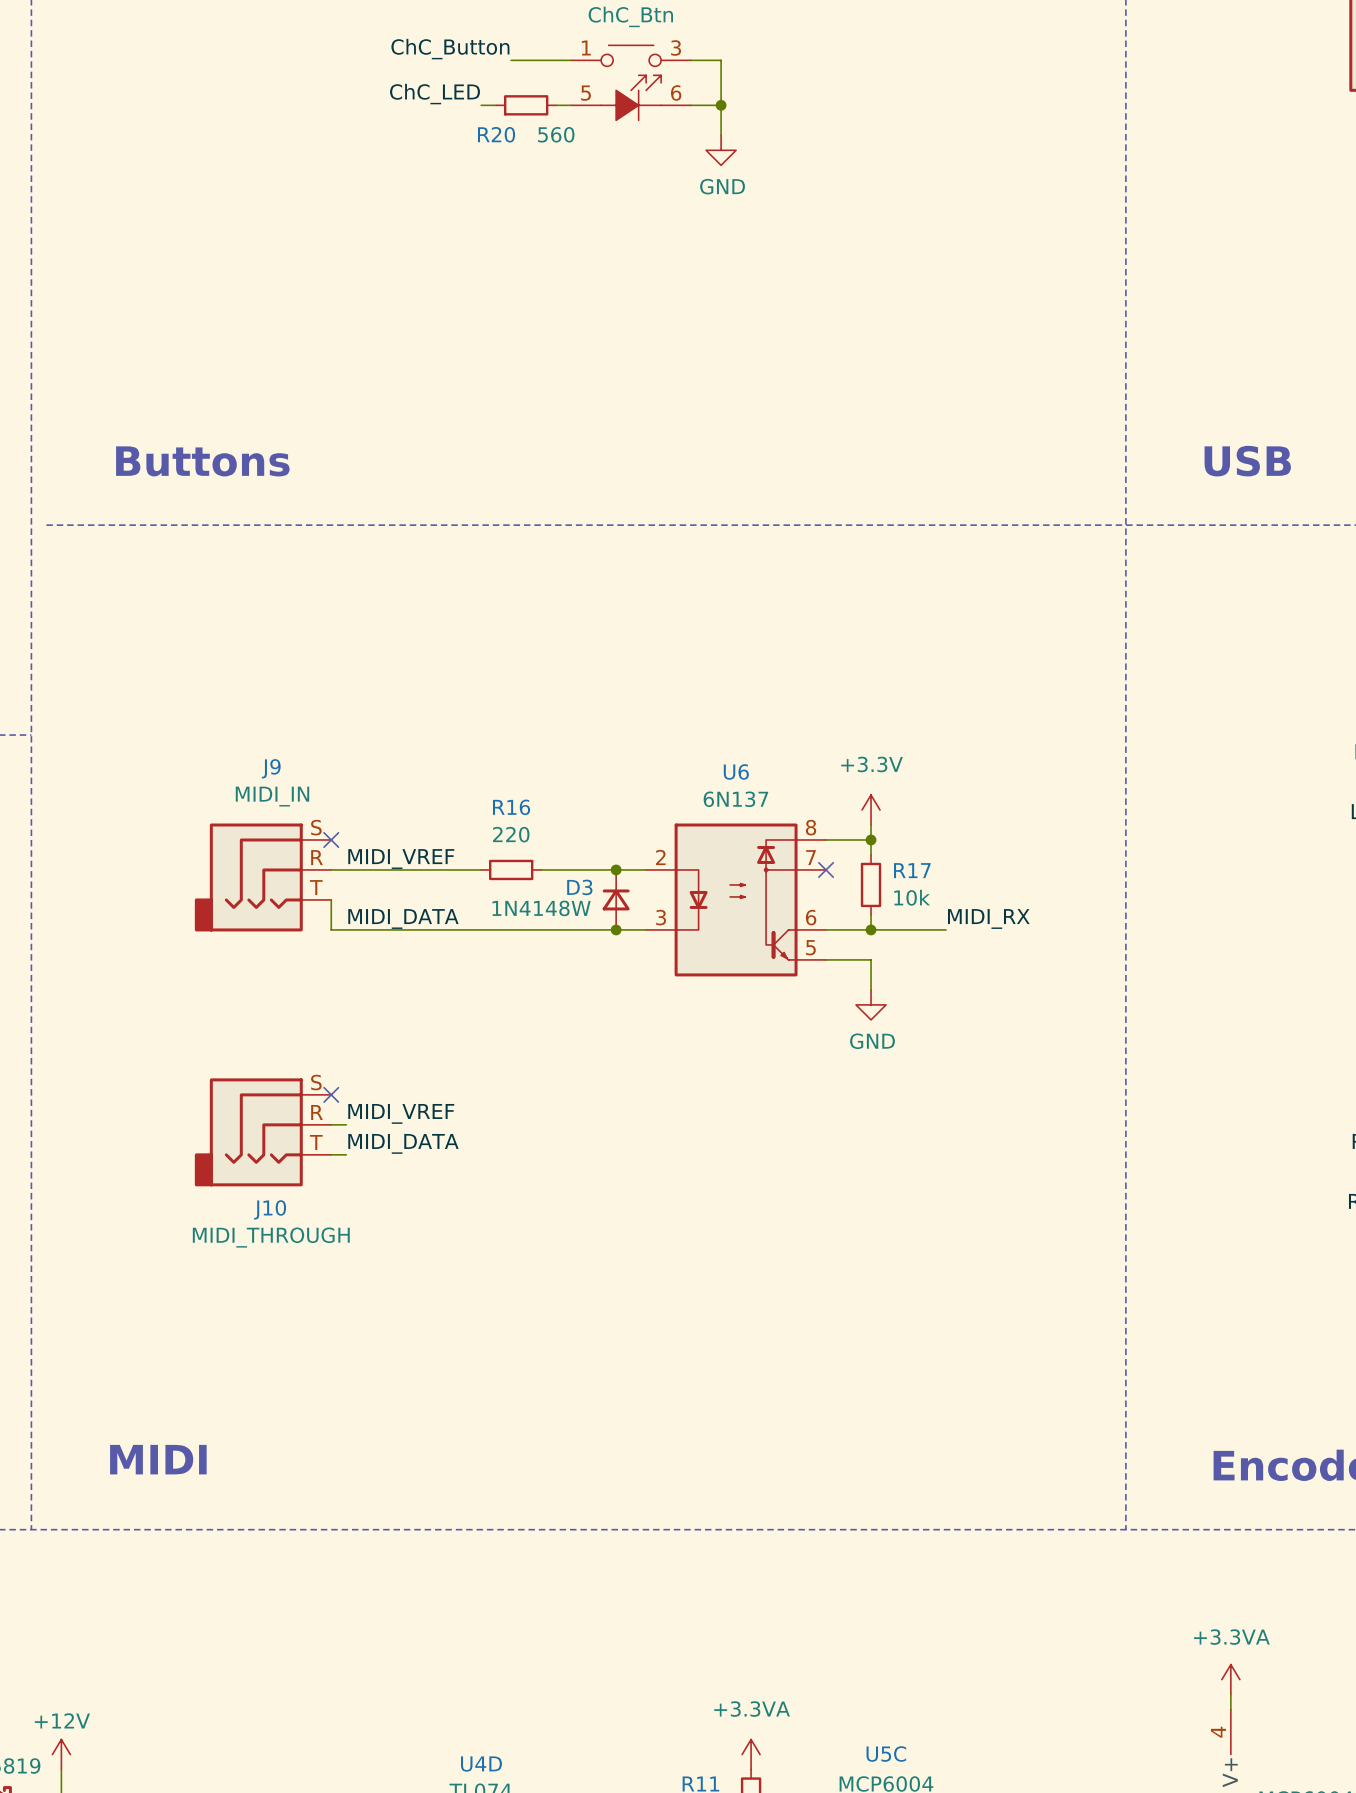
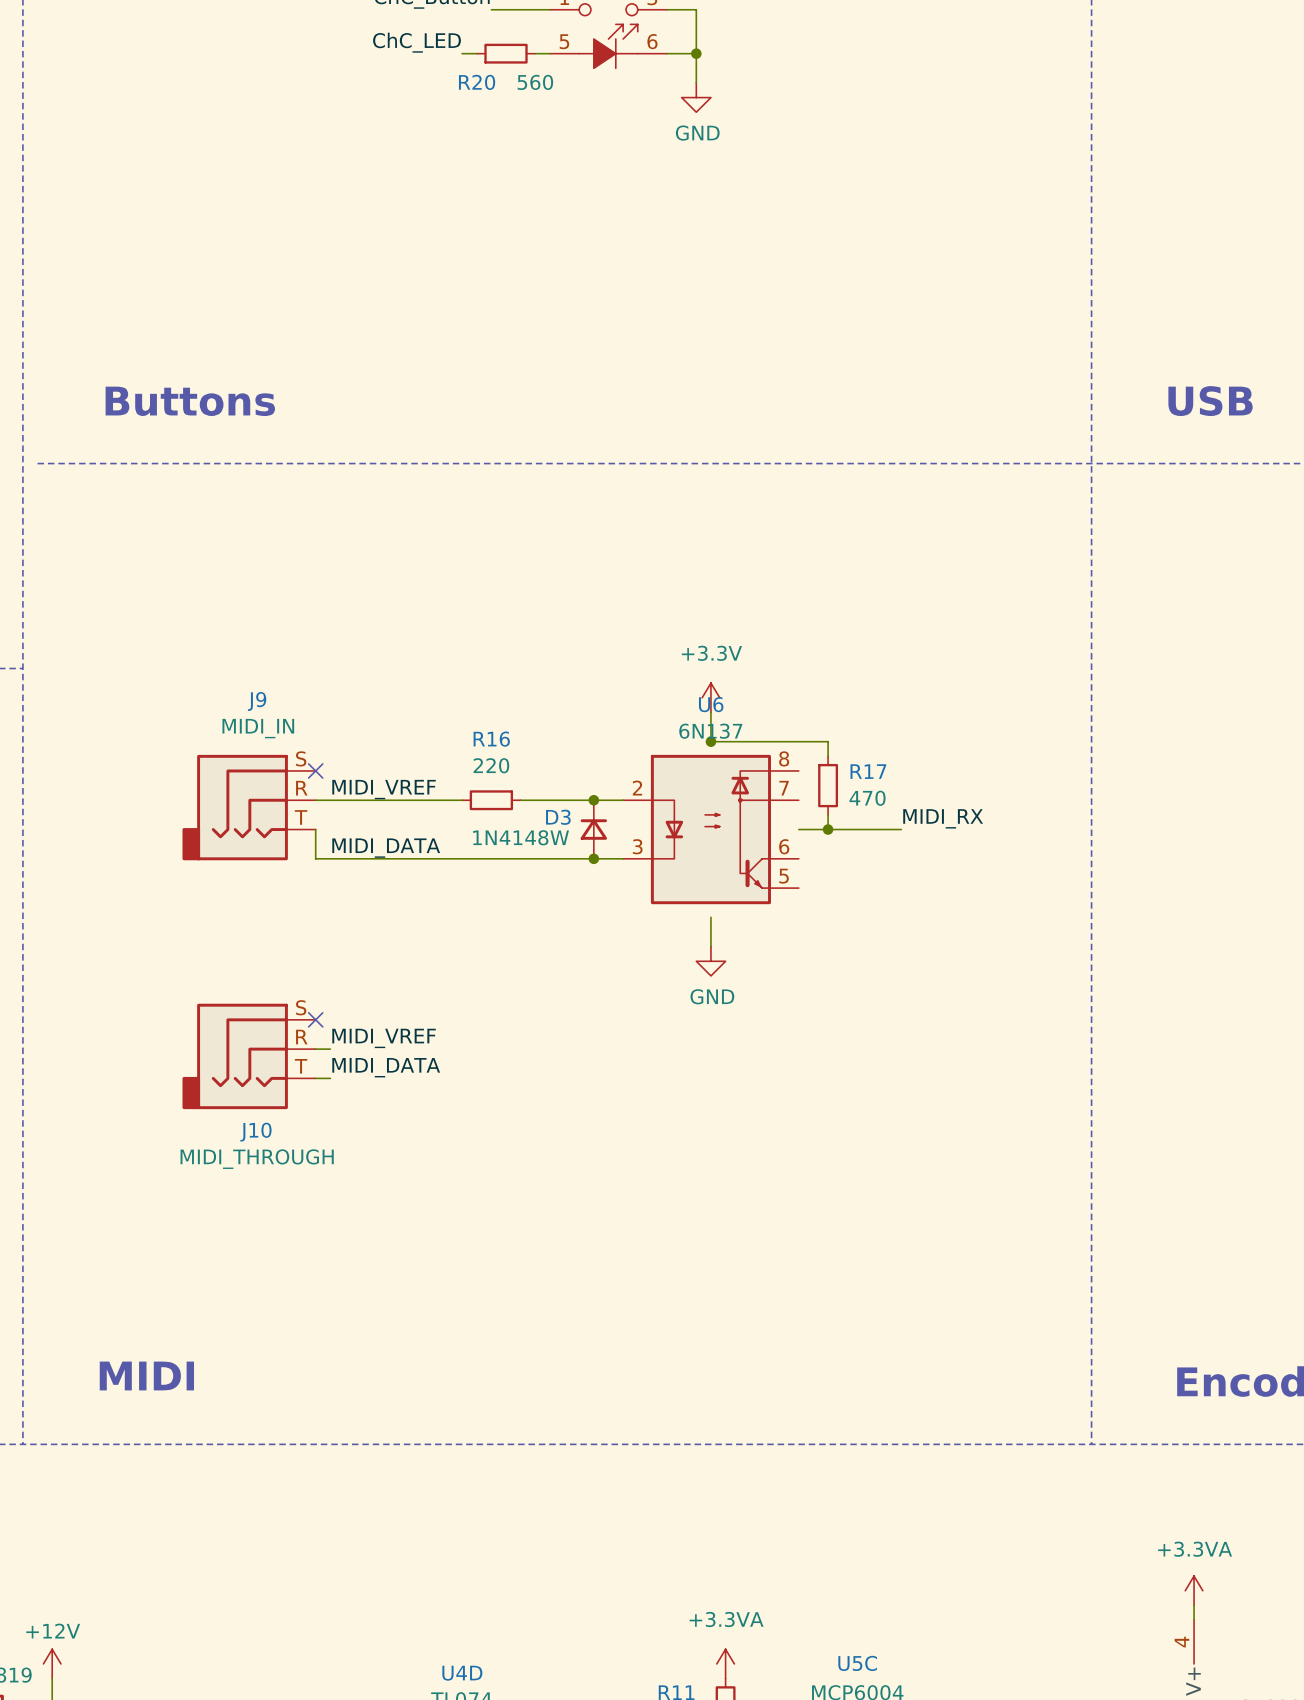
wire: none -> (710, 712) (710, 741) (828, 741) (828, 756)
junction: none -> (710, 741)
power symbol position: +3.3V (871, 810) -> +3.3V (710, 697)
wire: (871, 825) (871, 854) -> (710, 917) (710, 946)
wire: (826, 839) (871, 839) -> none
junction: (871, 839) -> none
no-connect mark: (826, 869) -> none
R17 position: (871, 884) -> (828, 785)
R17 value: 10k (912, 897) -> 470 (867, 798)
wire: none -> (798, 829) (901, 829)
junction: none -> (828, 829)
wire: (871, 914) (871, 929) -> (828, 814) (828, 829)
label position: MIDI_RX (988, 918) -> MIDI_RX (943, 818)
wire: (826, 929) (945, 929) -> none
junction: (871, 929) -> none
wire: (826, 959) (871, 959) (871, 989) -> none
power symbol position: GND (871, 1004) -> GND (710, 961)

